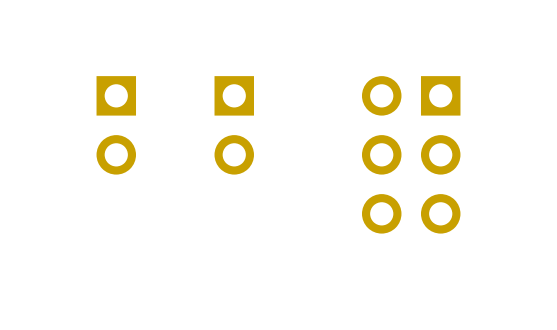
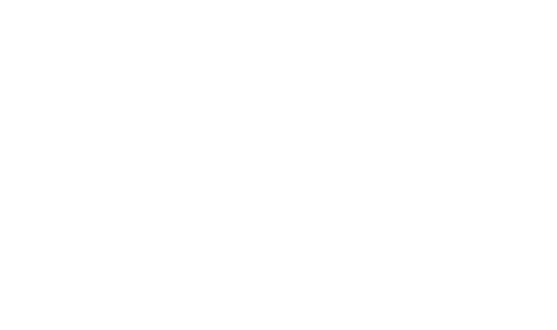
part: (116, 125) -> none
part: (234, 125) -> none
part: (411, 154) -> none

